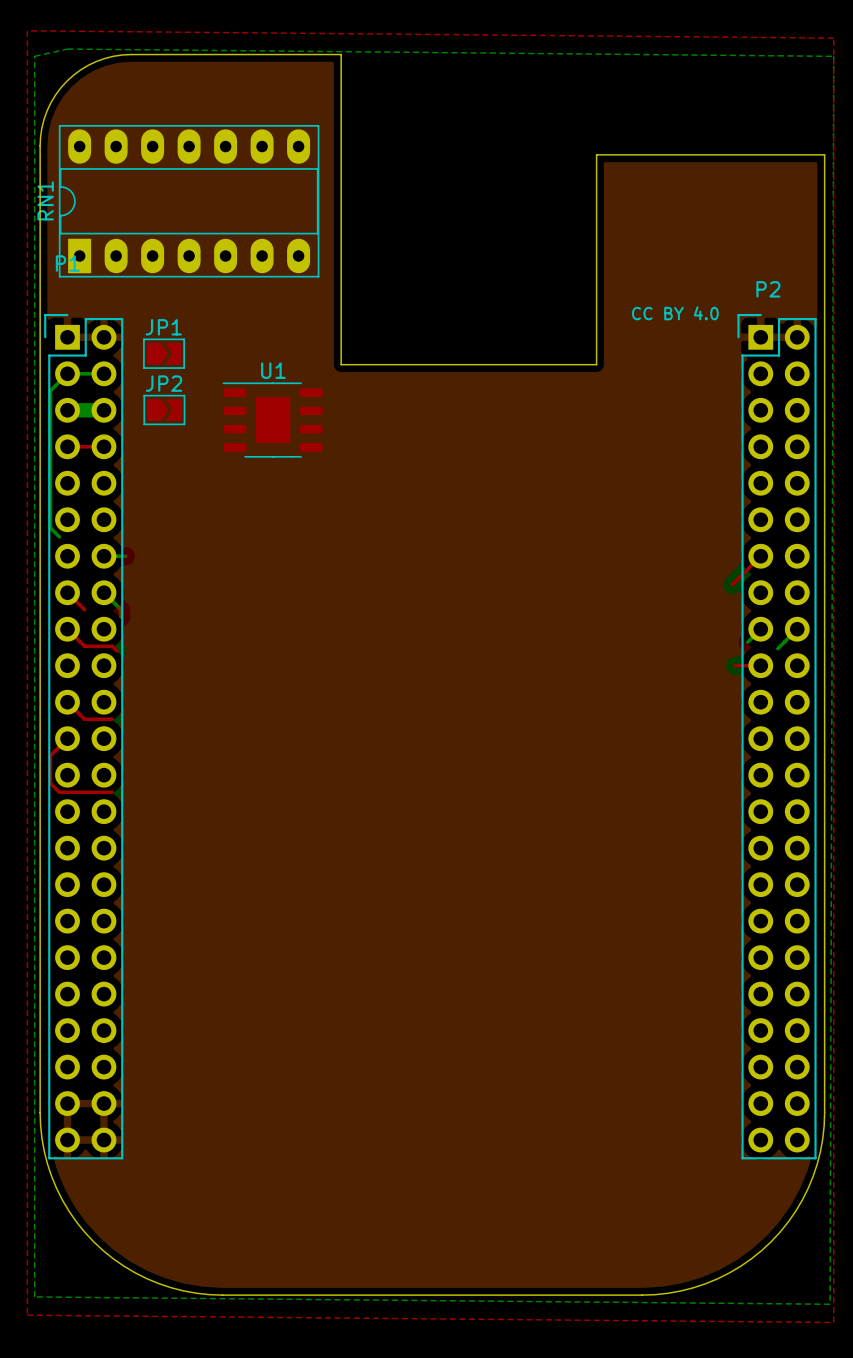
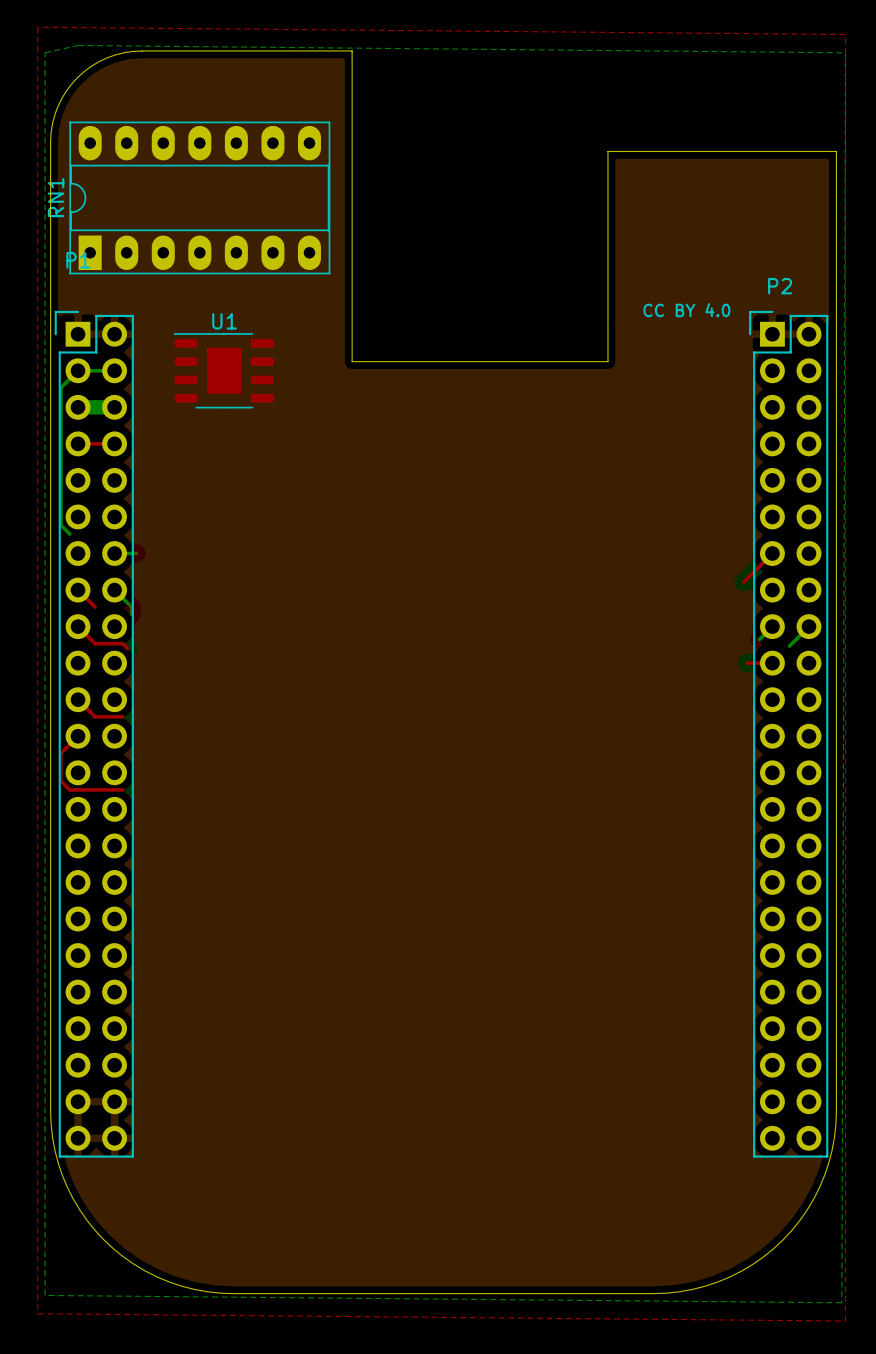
JP1: (164, 353) -> none
JP2: (164, 410) -> none
U1 position: (272, 420) -> (223, 370)

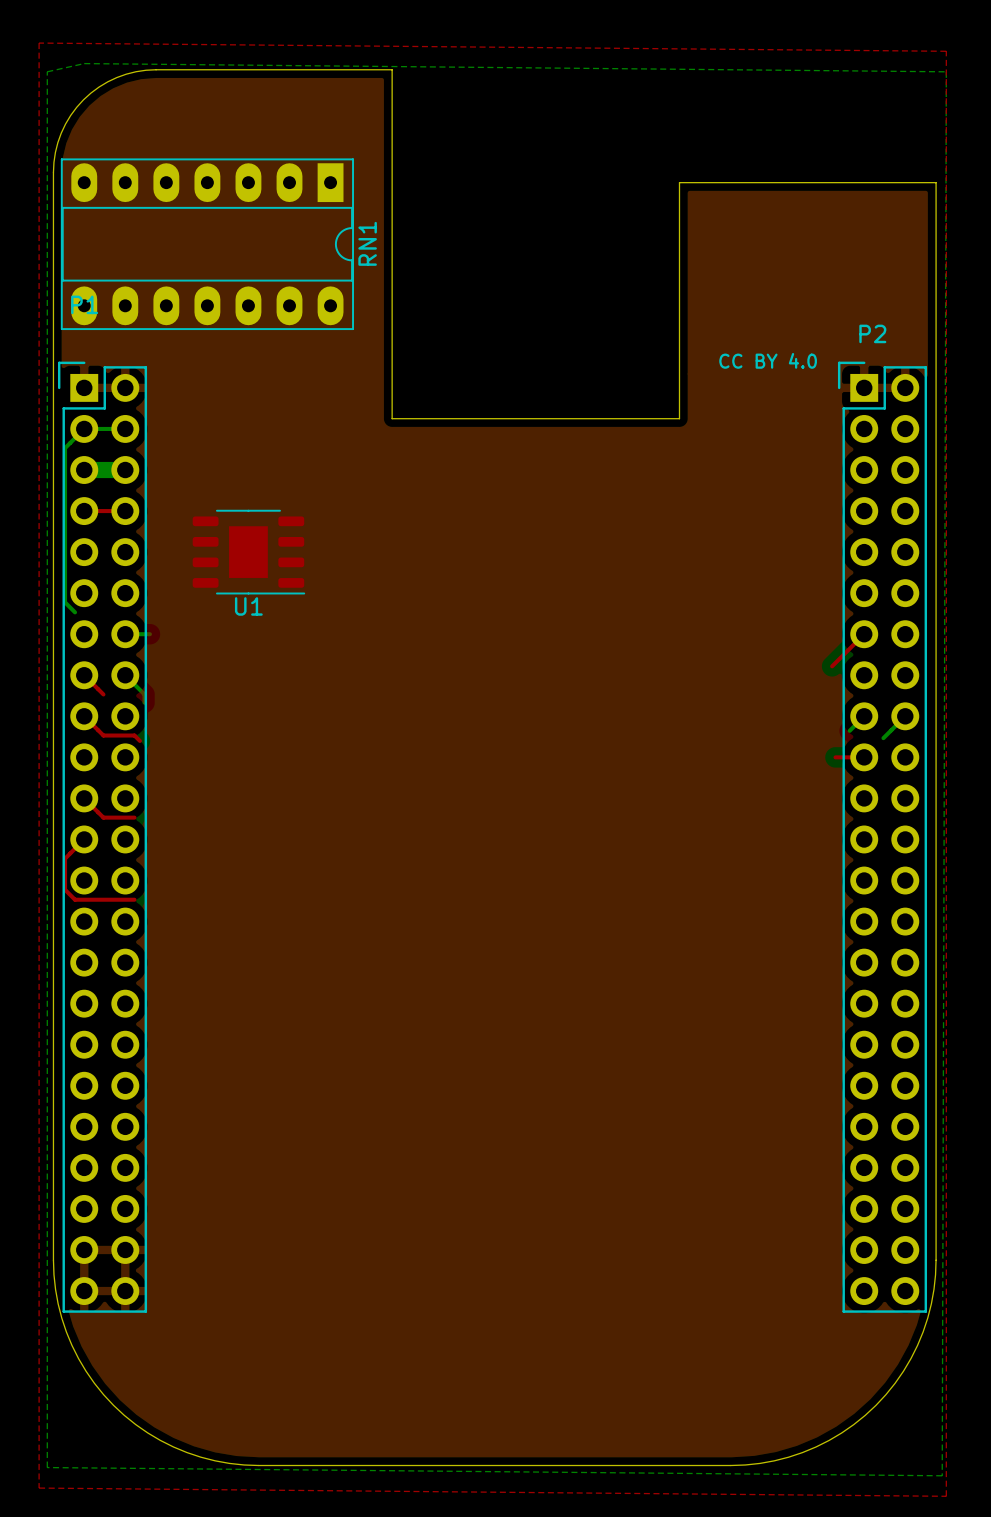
RN1 rotation: 0° (199, 197) -> 180° (207, 244)
U1 rotation: 0° (223, 370) -> 180° (248, 552)
U1 position: (223, 370) -> (248, 552)

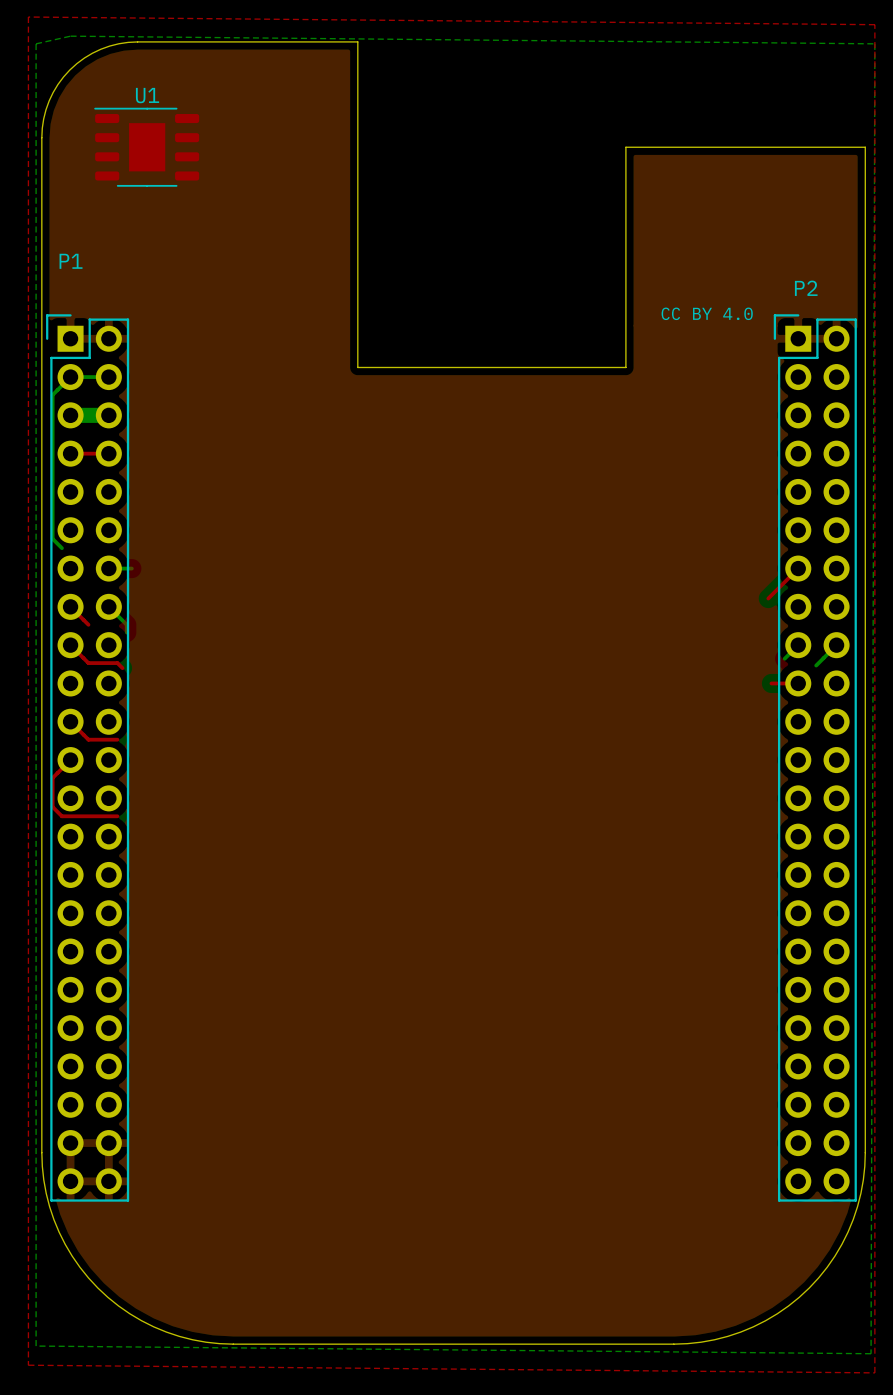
RN1: (207, 244) -> none
U1 rotation: 0° (248, 552) -> 180° (146, 147)
U1 position: (248, 552) -> (146, 147)

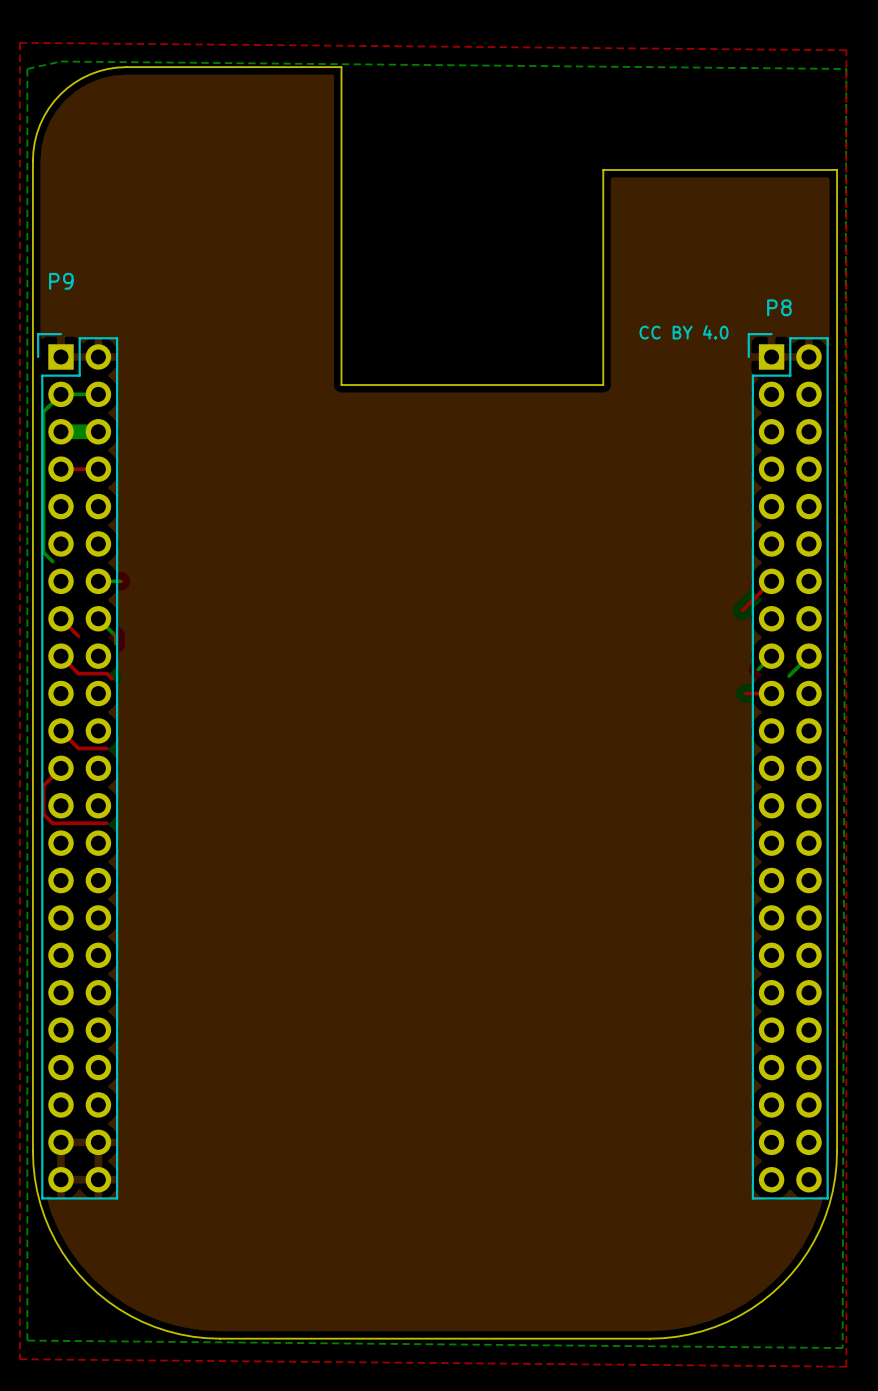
U1: (146, 147) -> none
P1 name: P1 (71, 261) -> P9 (61, 281)
P2 name: P2 (806, 288) -> P8 (779, 307)

